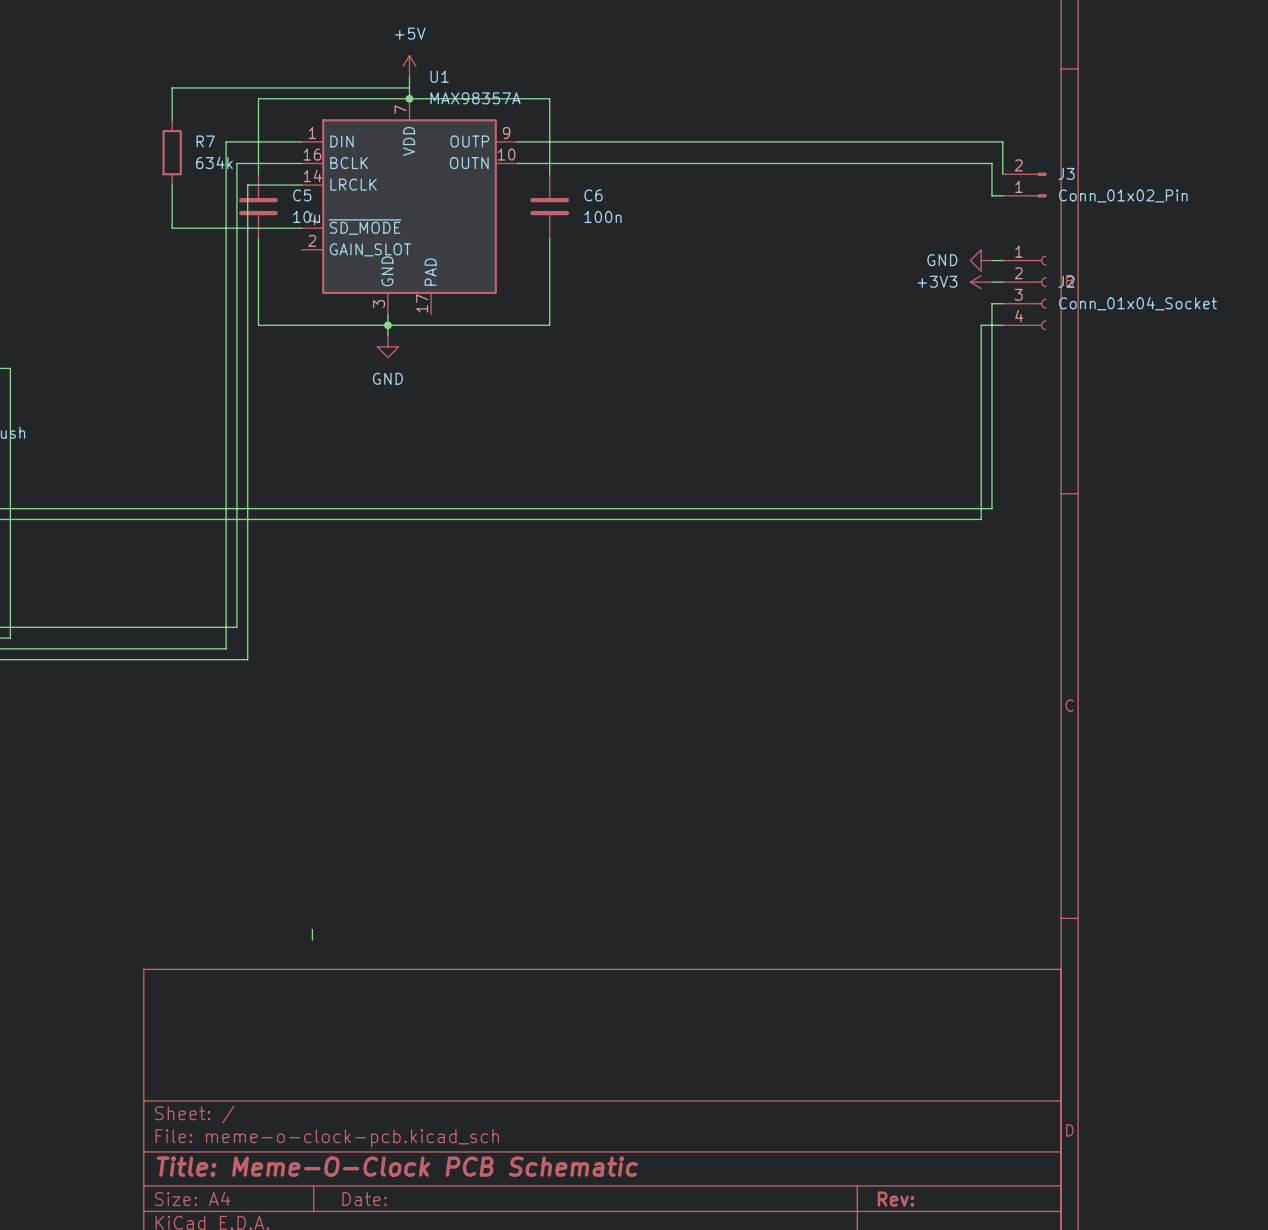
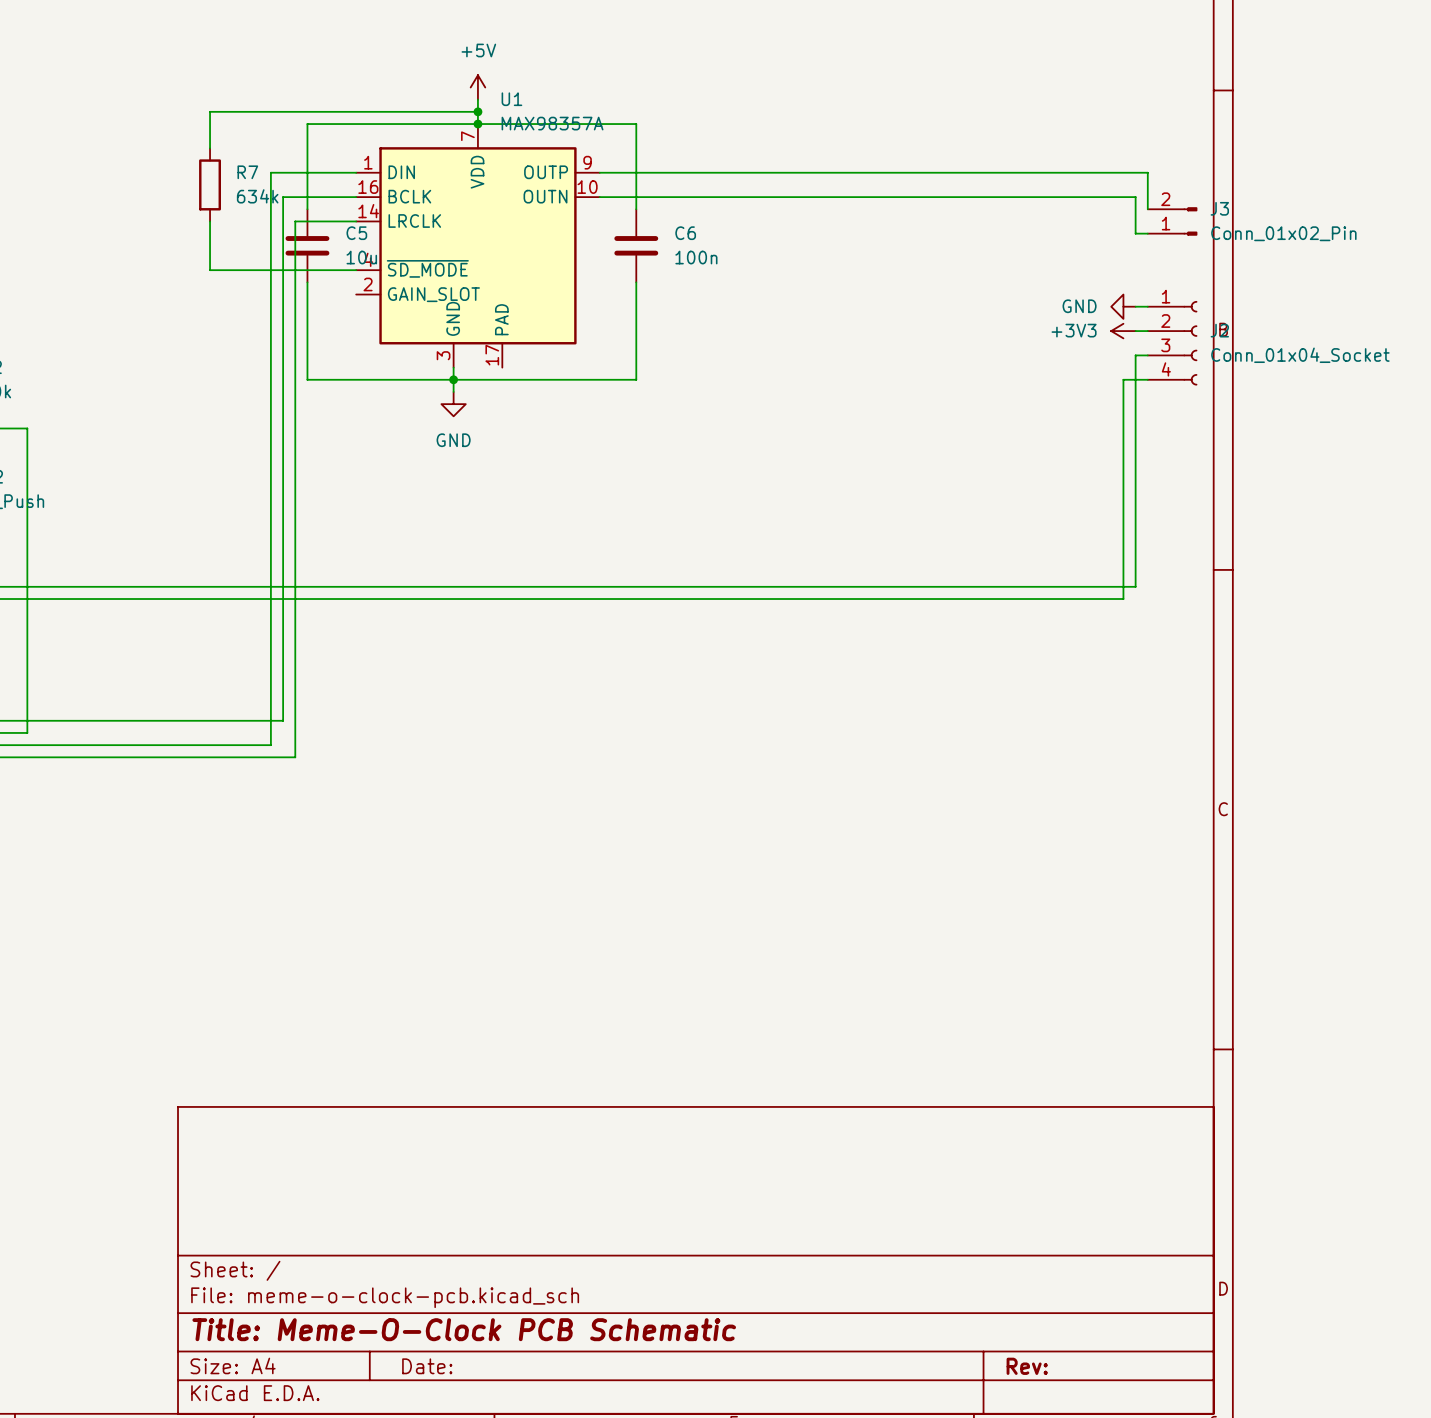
junction: none -> (477, 111)
wire: (312, 929) (312, 940) -> none

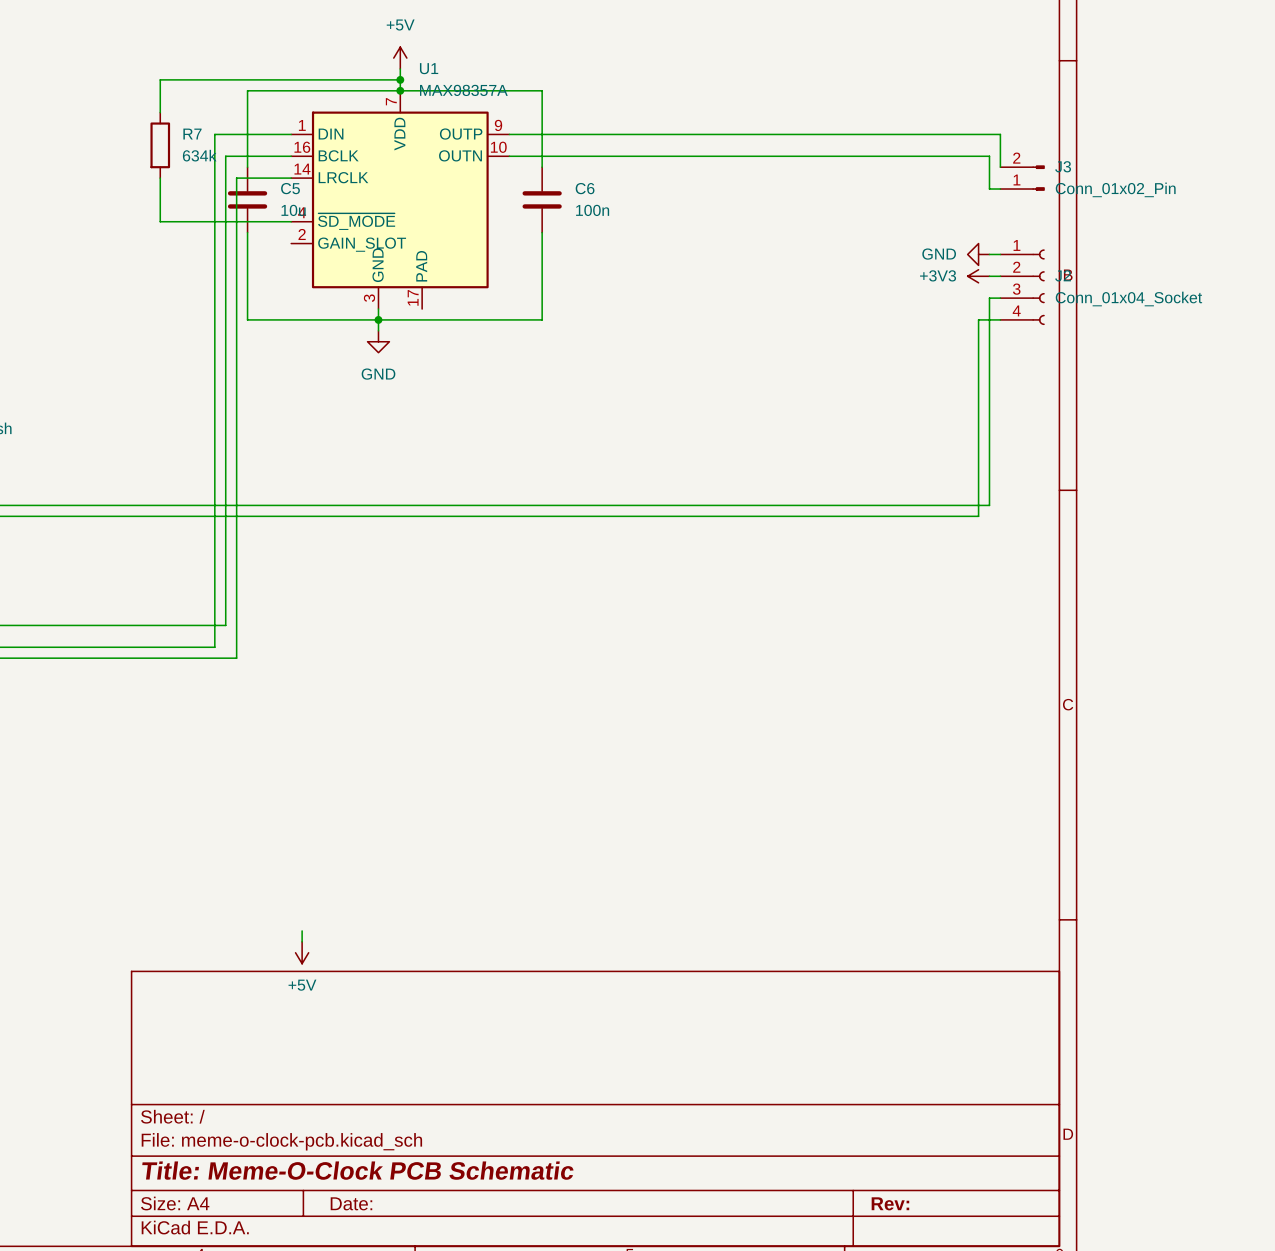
wire: none -> (302, 930) (302, 941)
power symbol: none -> +5V (302, 952)

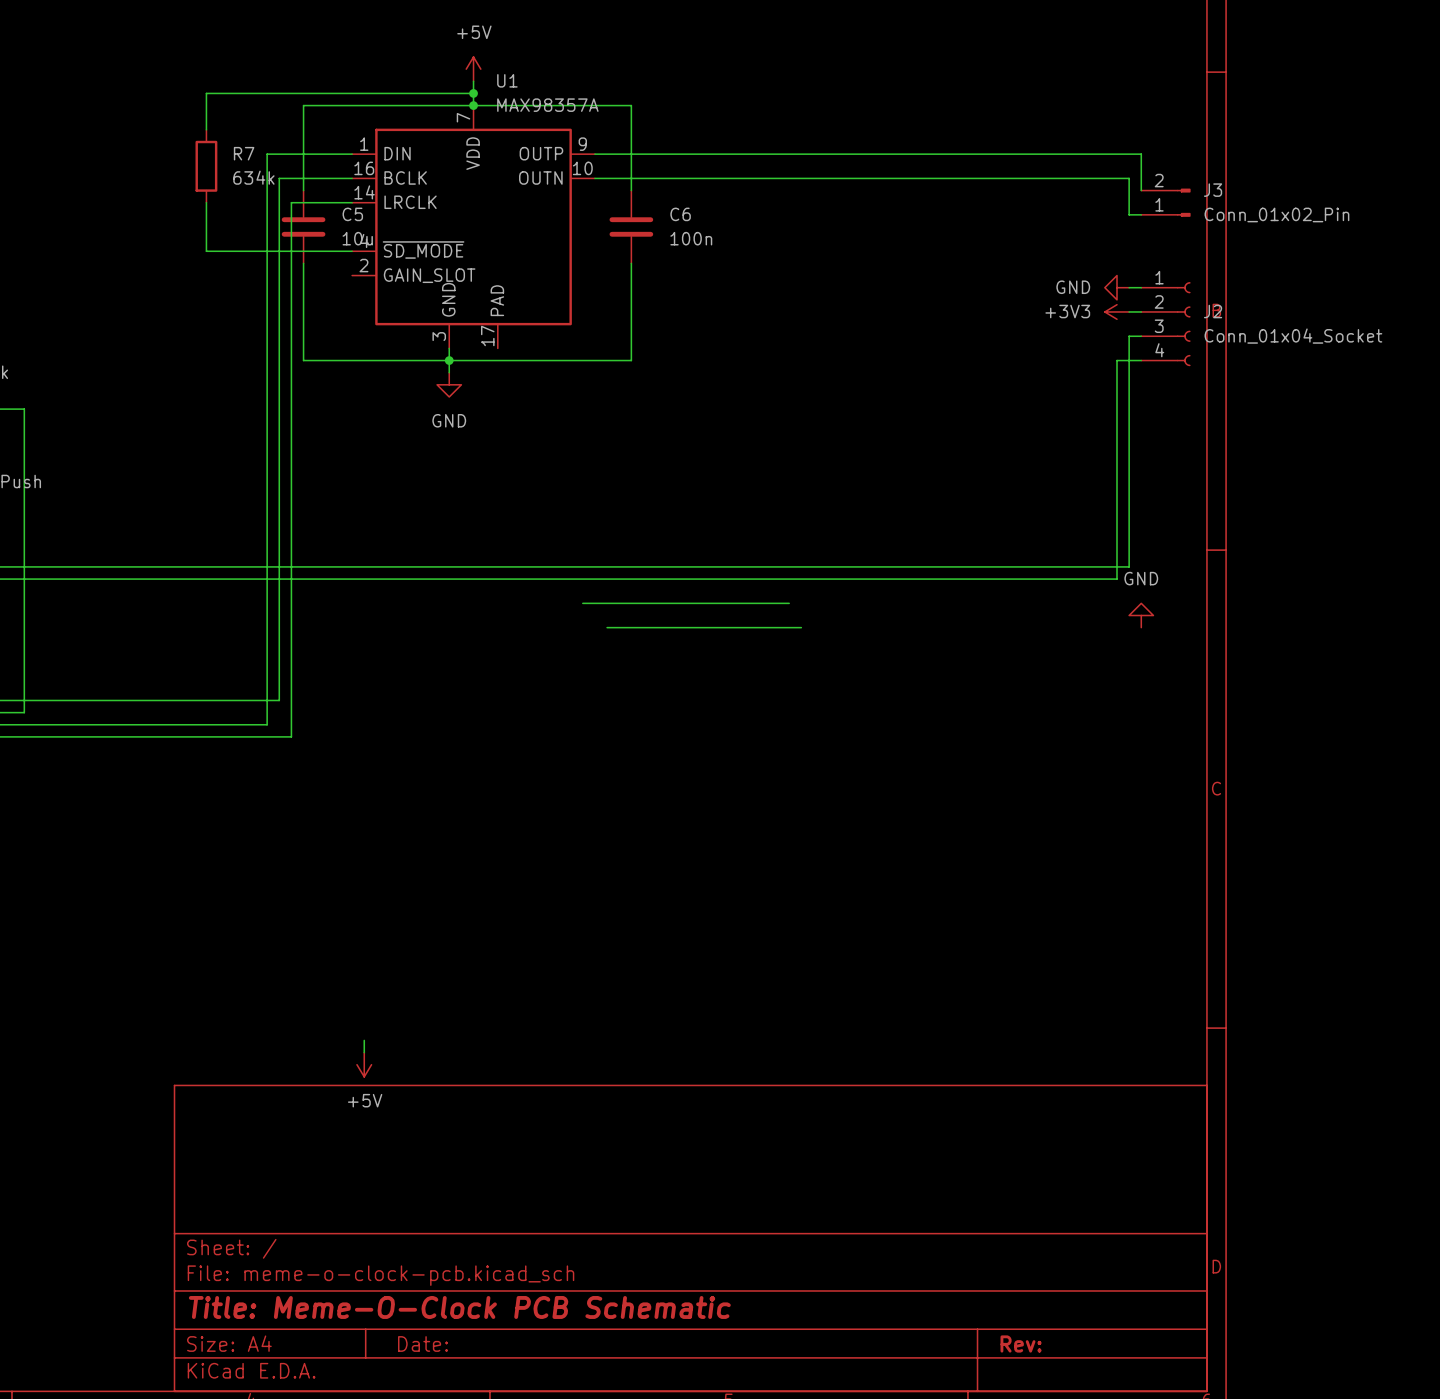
wire: none -> (582, 603) (789, 603)
power symbol: none -> GND (1141, 615)
wire: none -> (607, 627) (801, 627)

